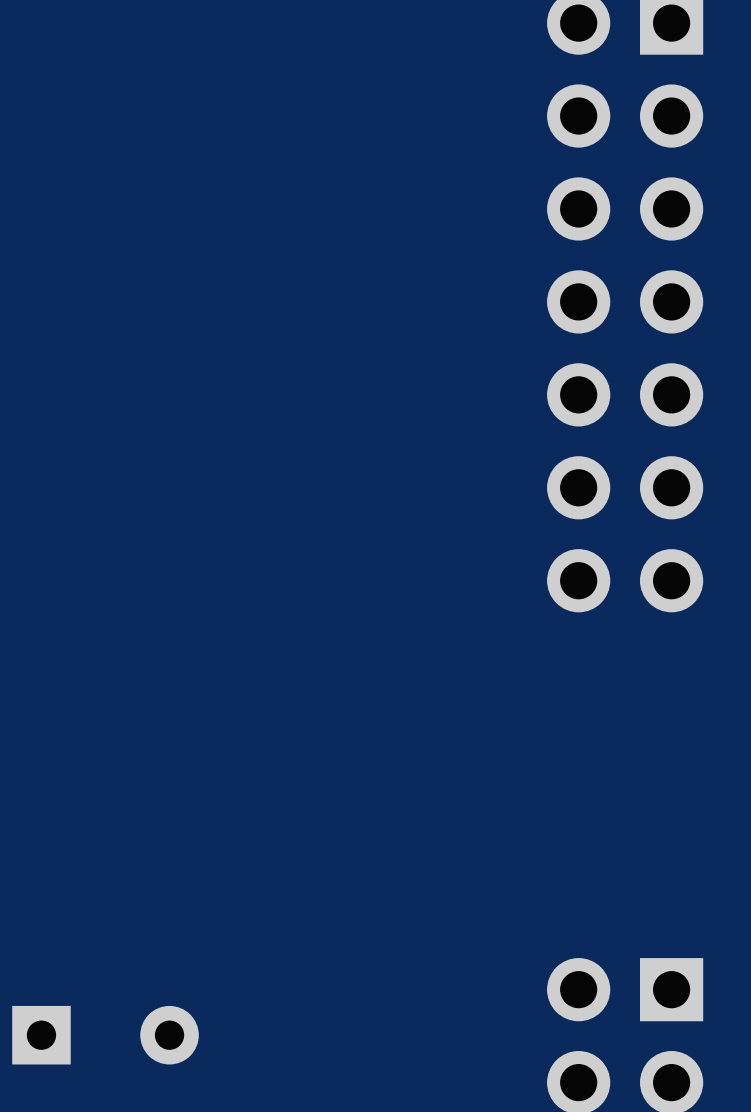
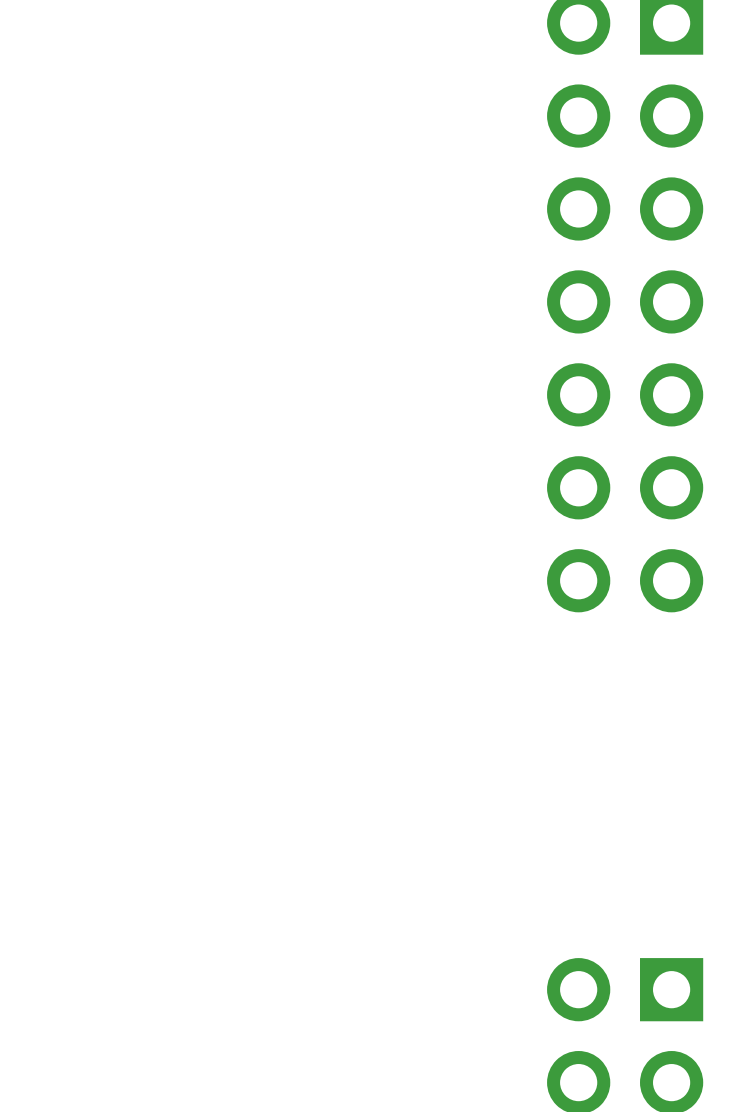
part: (105, 1035) -> none

